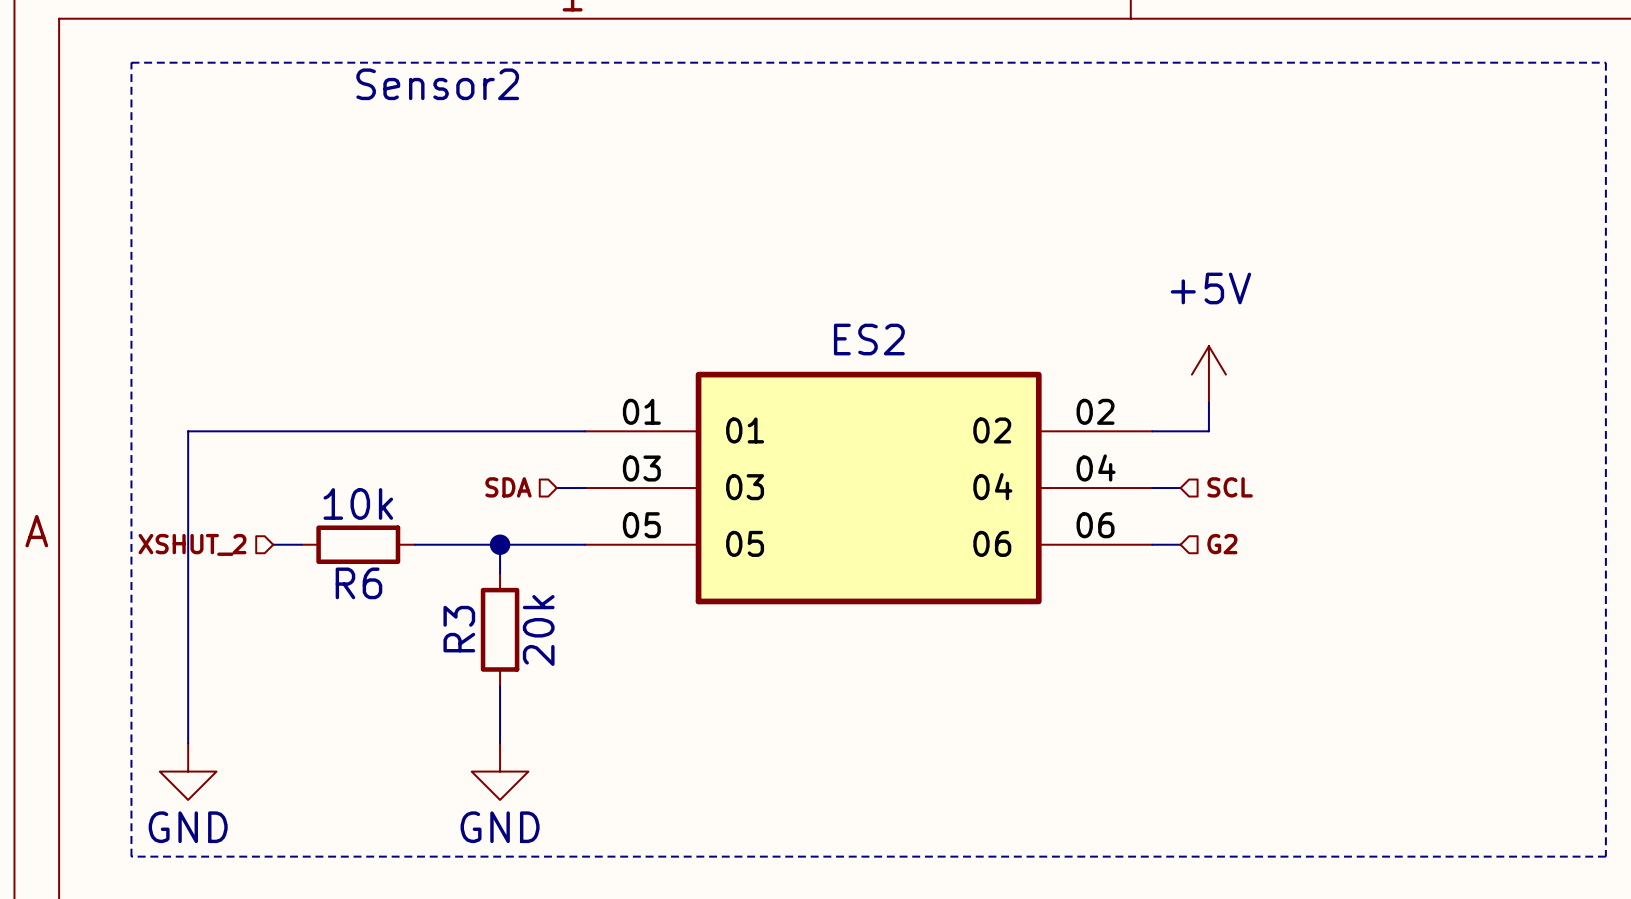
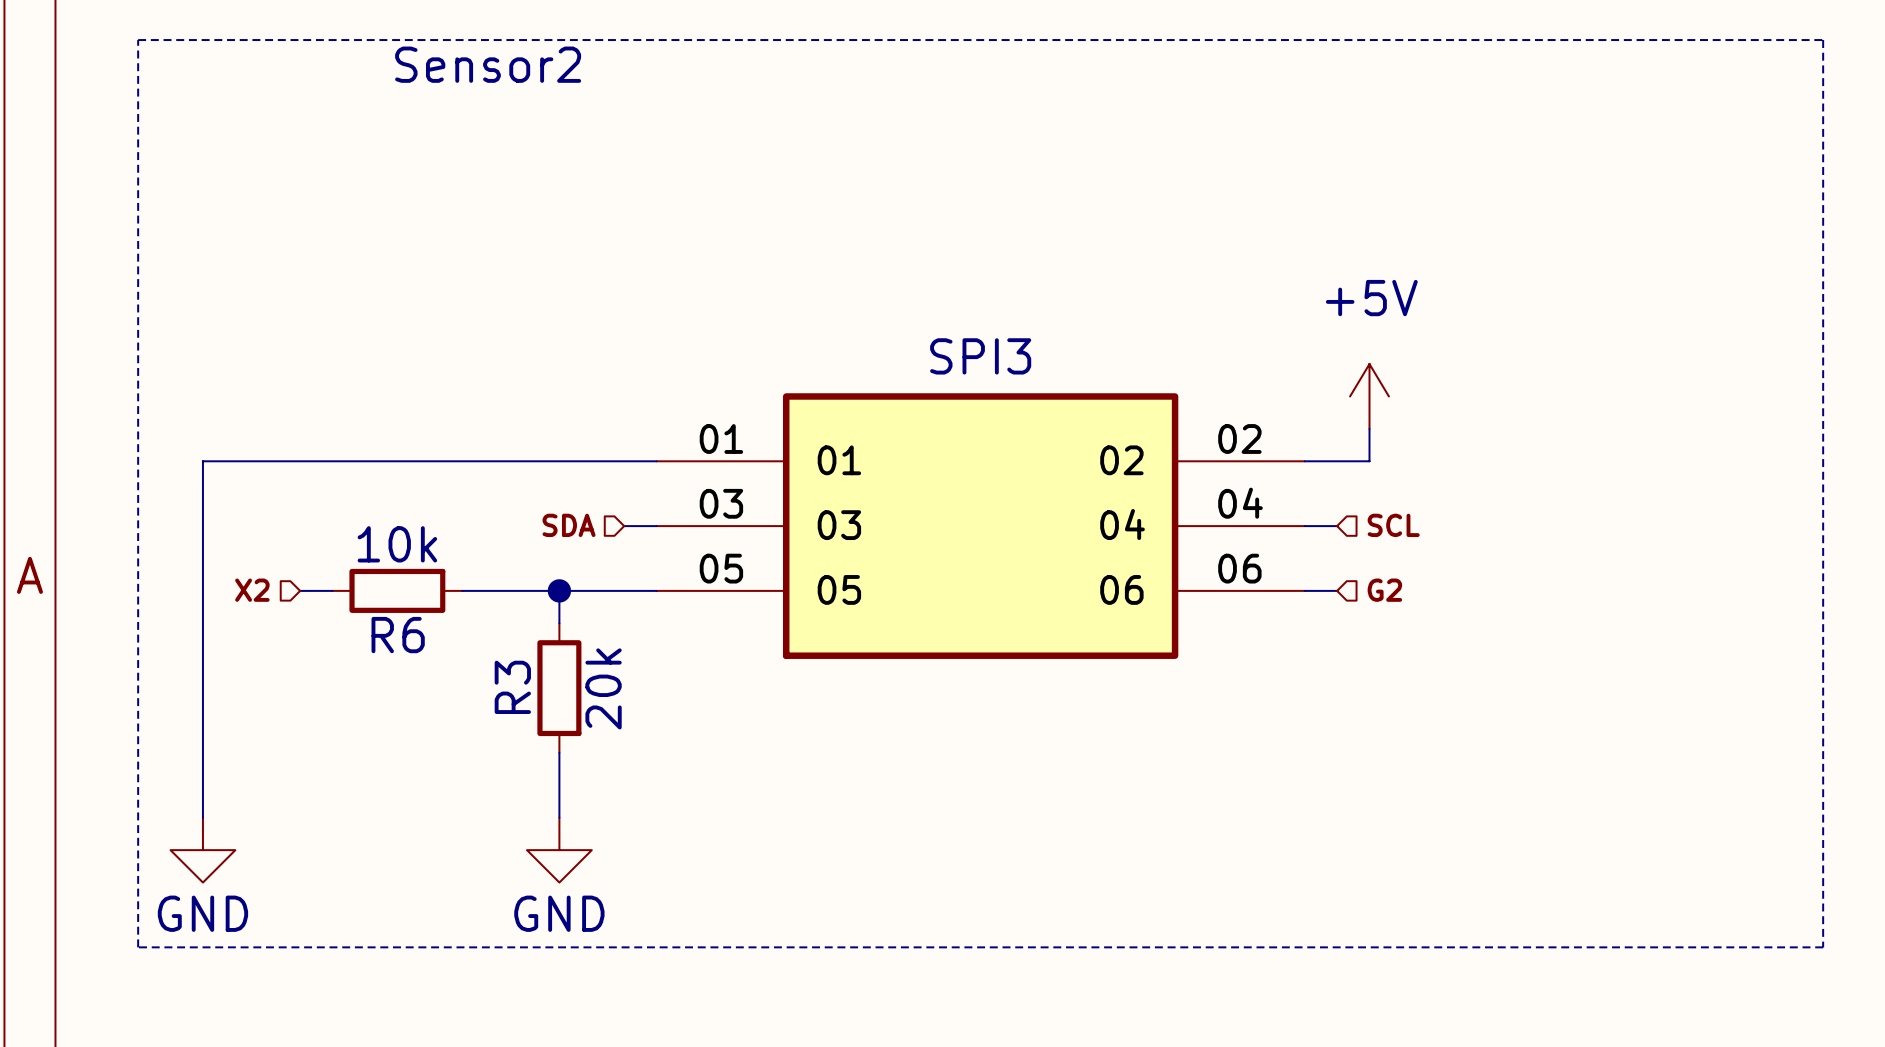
ES2 name: ES2 (869, 339) -> SPI3 (980, 356)
hierarchical label: XSHUT_2 (192, 544) -> X2 (252, 590)

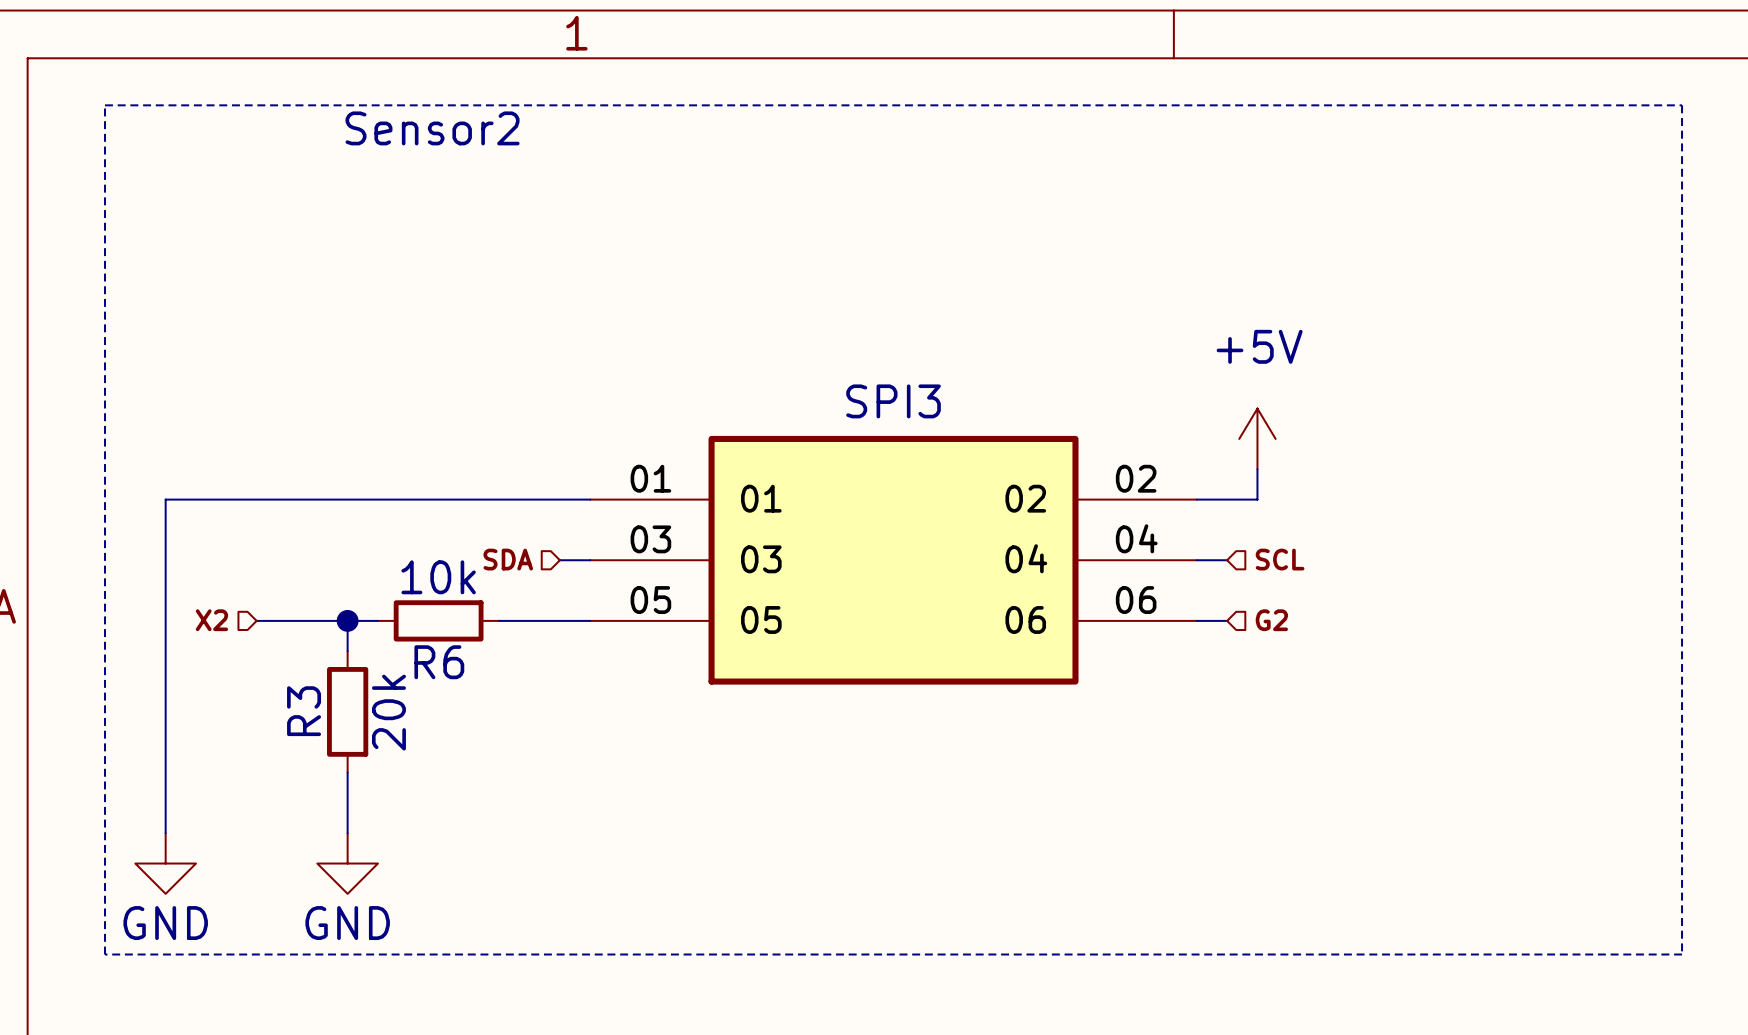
wire: none -> (286, 620) (377, 620)
wire: none -> (347, 620) (347, 651)
junction: none -> (347, 620)
R6 position: (397, 590) -> (438, 620)
wire: (462, 590) (559, 590) (559, 623) -> none
junction: (559, 590) -> none
R3 position: (559, 688) -> (347, 711)
wire: (559, 752) (559, 817) -> (347, 772) (347, 833)
power symbol position: GND (559, 850) -> GND (347, 863)

